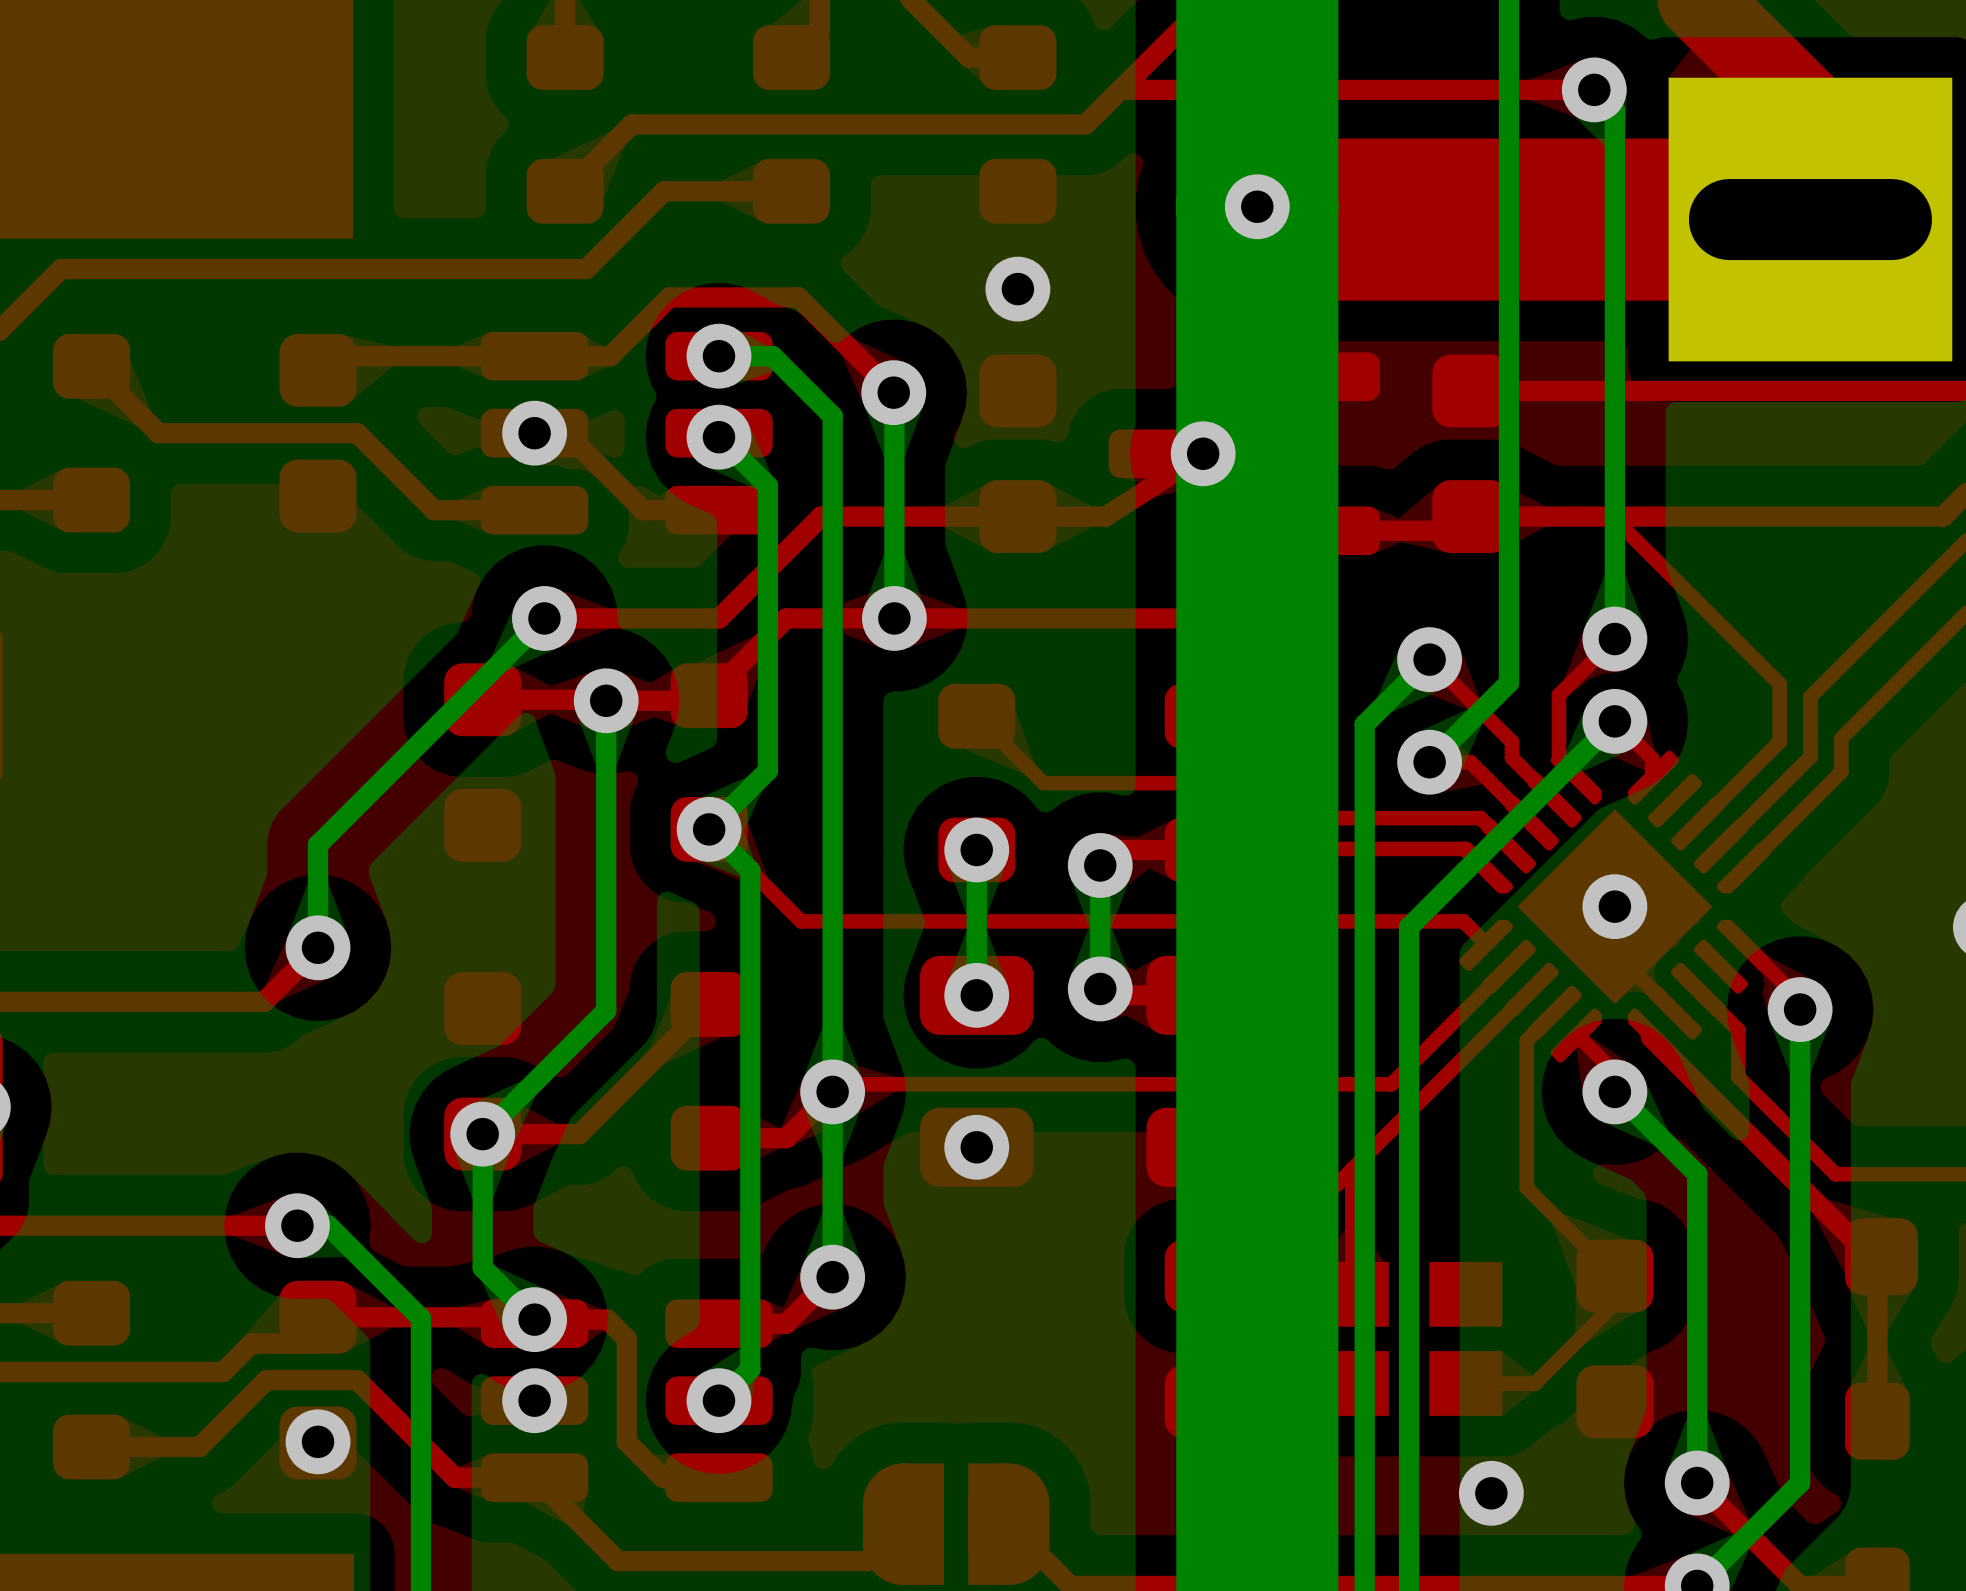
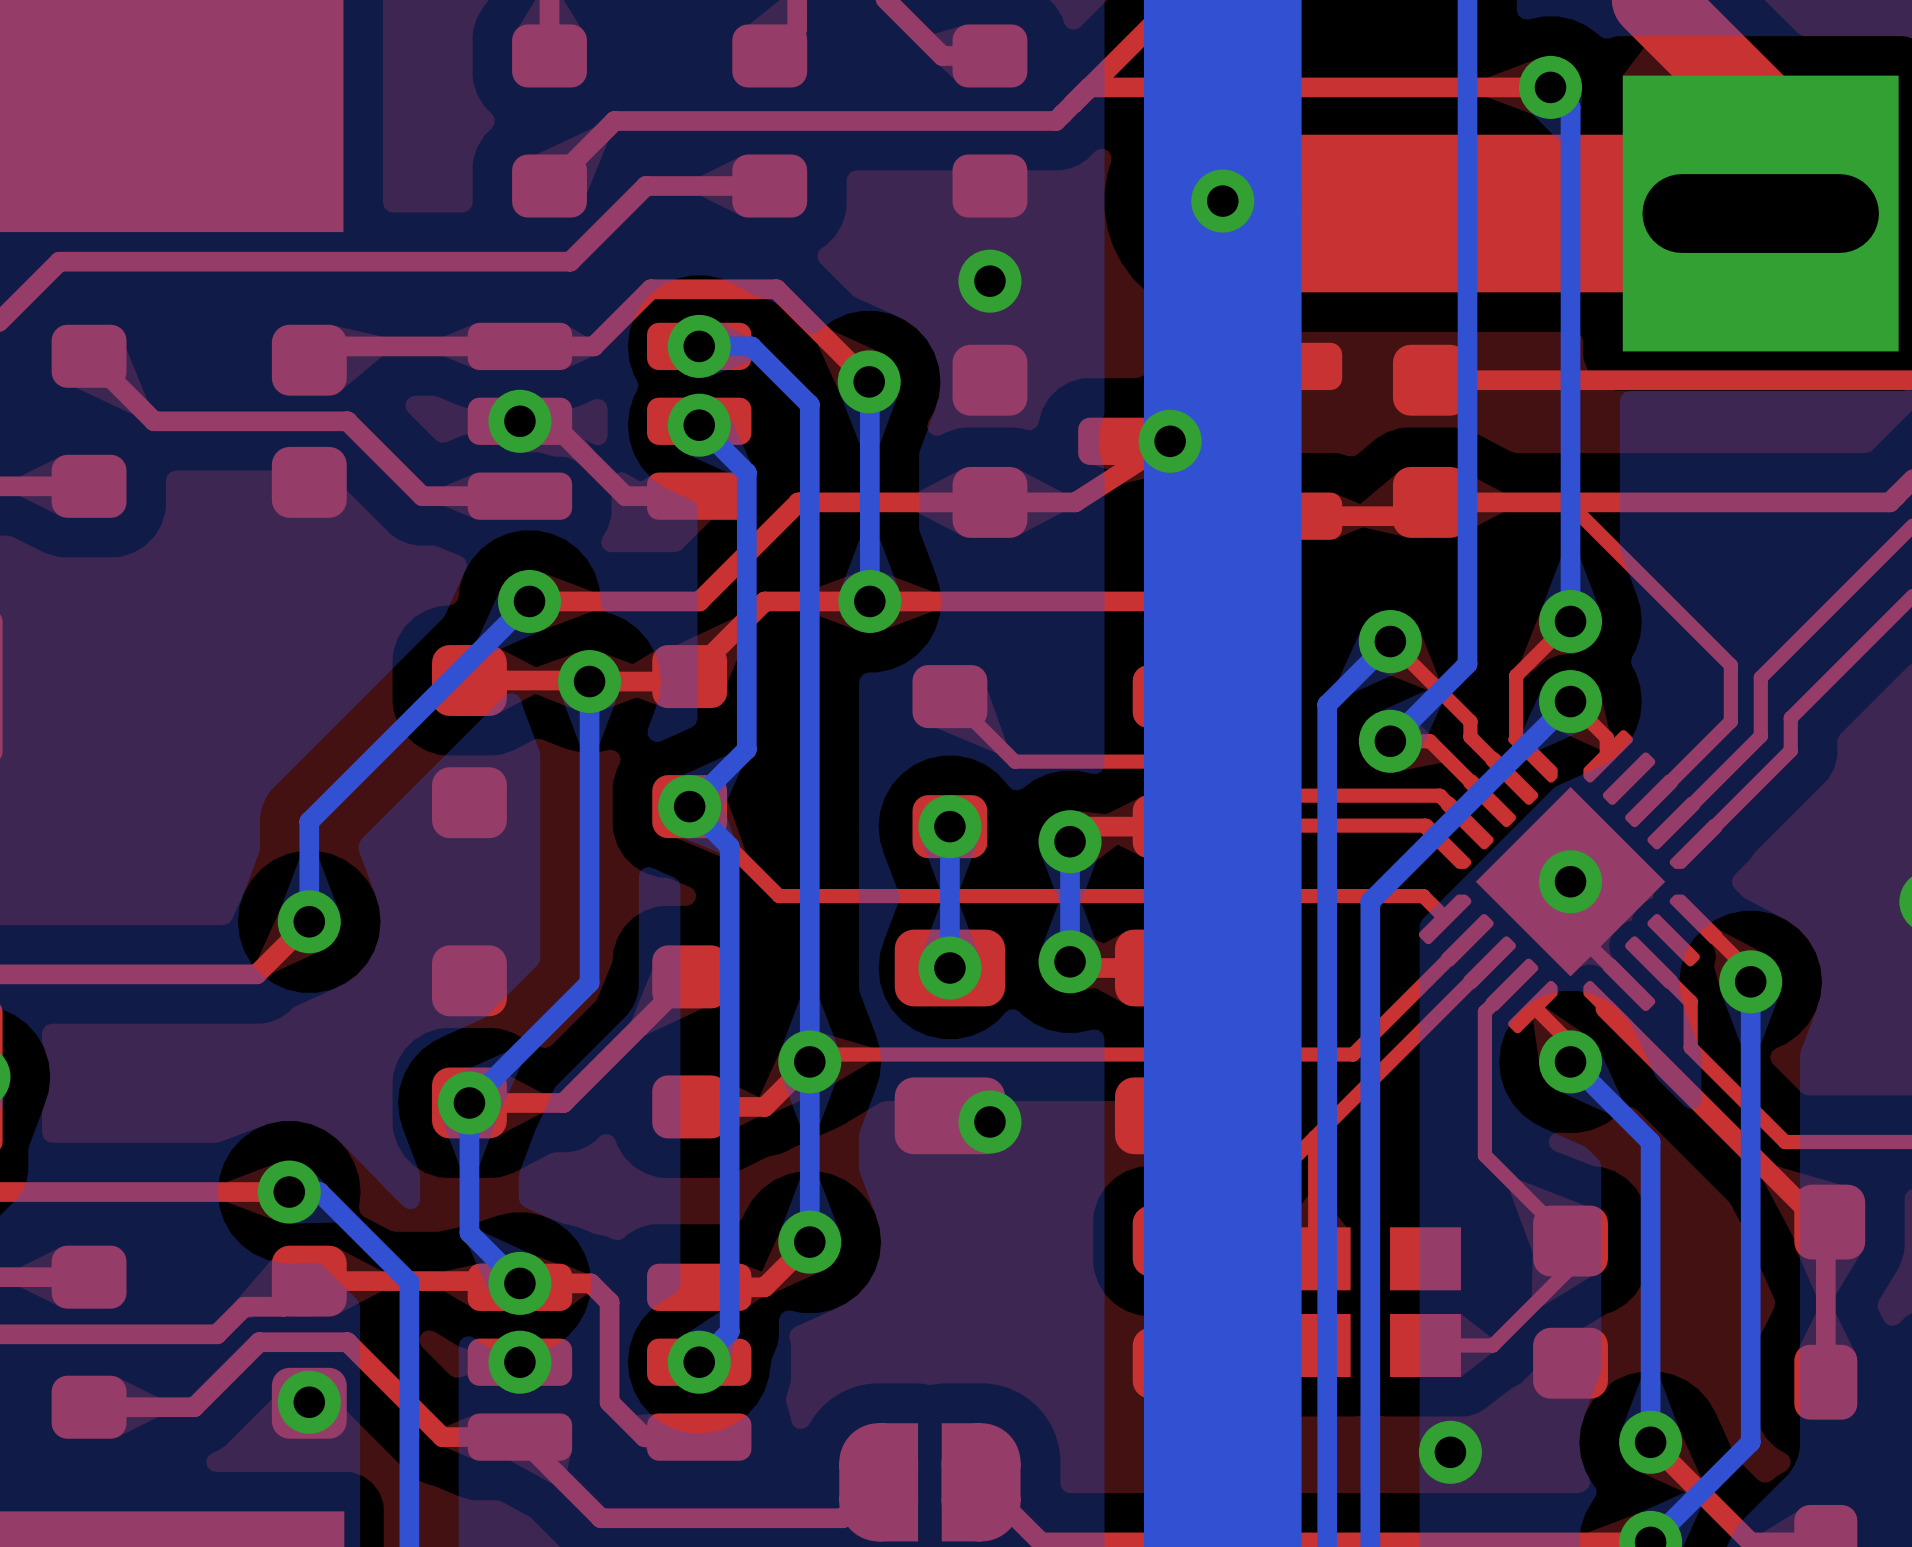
via position: (976, 1147) -> (989, 1121)

